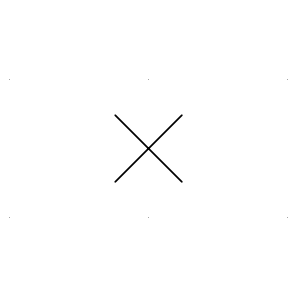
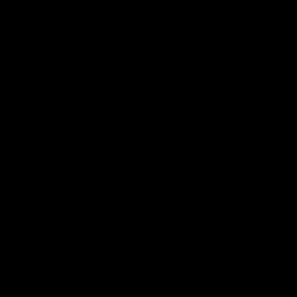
no-connect mark: (148, 148) -> none

